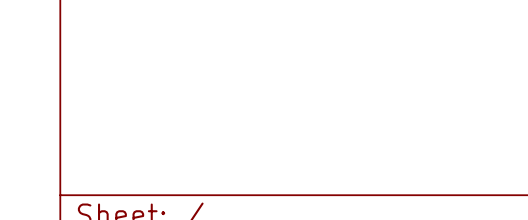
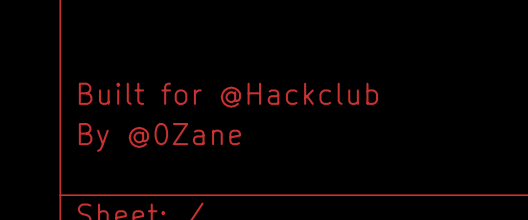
title block: none -> Built for @Hackclub (228, 95)
title block: none -> By @0Zane (159, 137)

